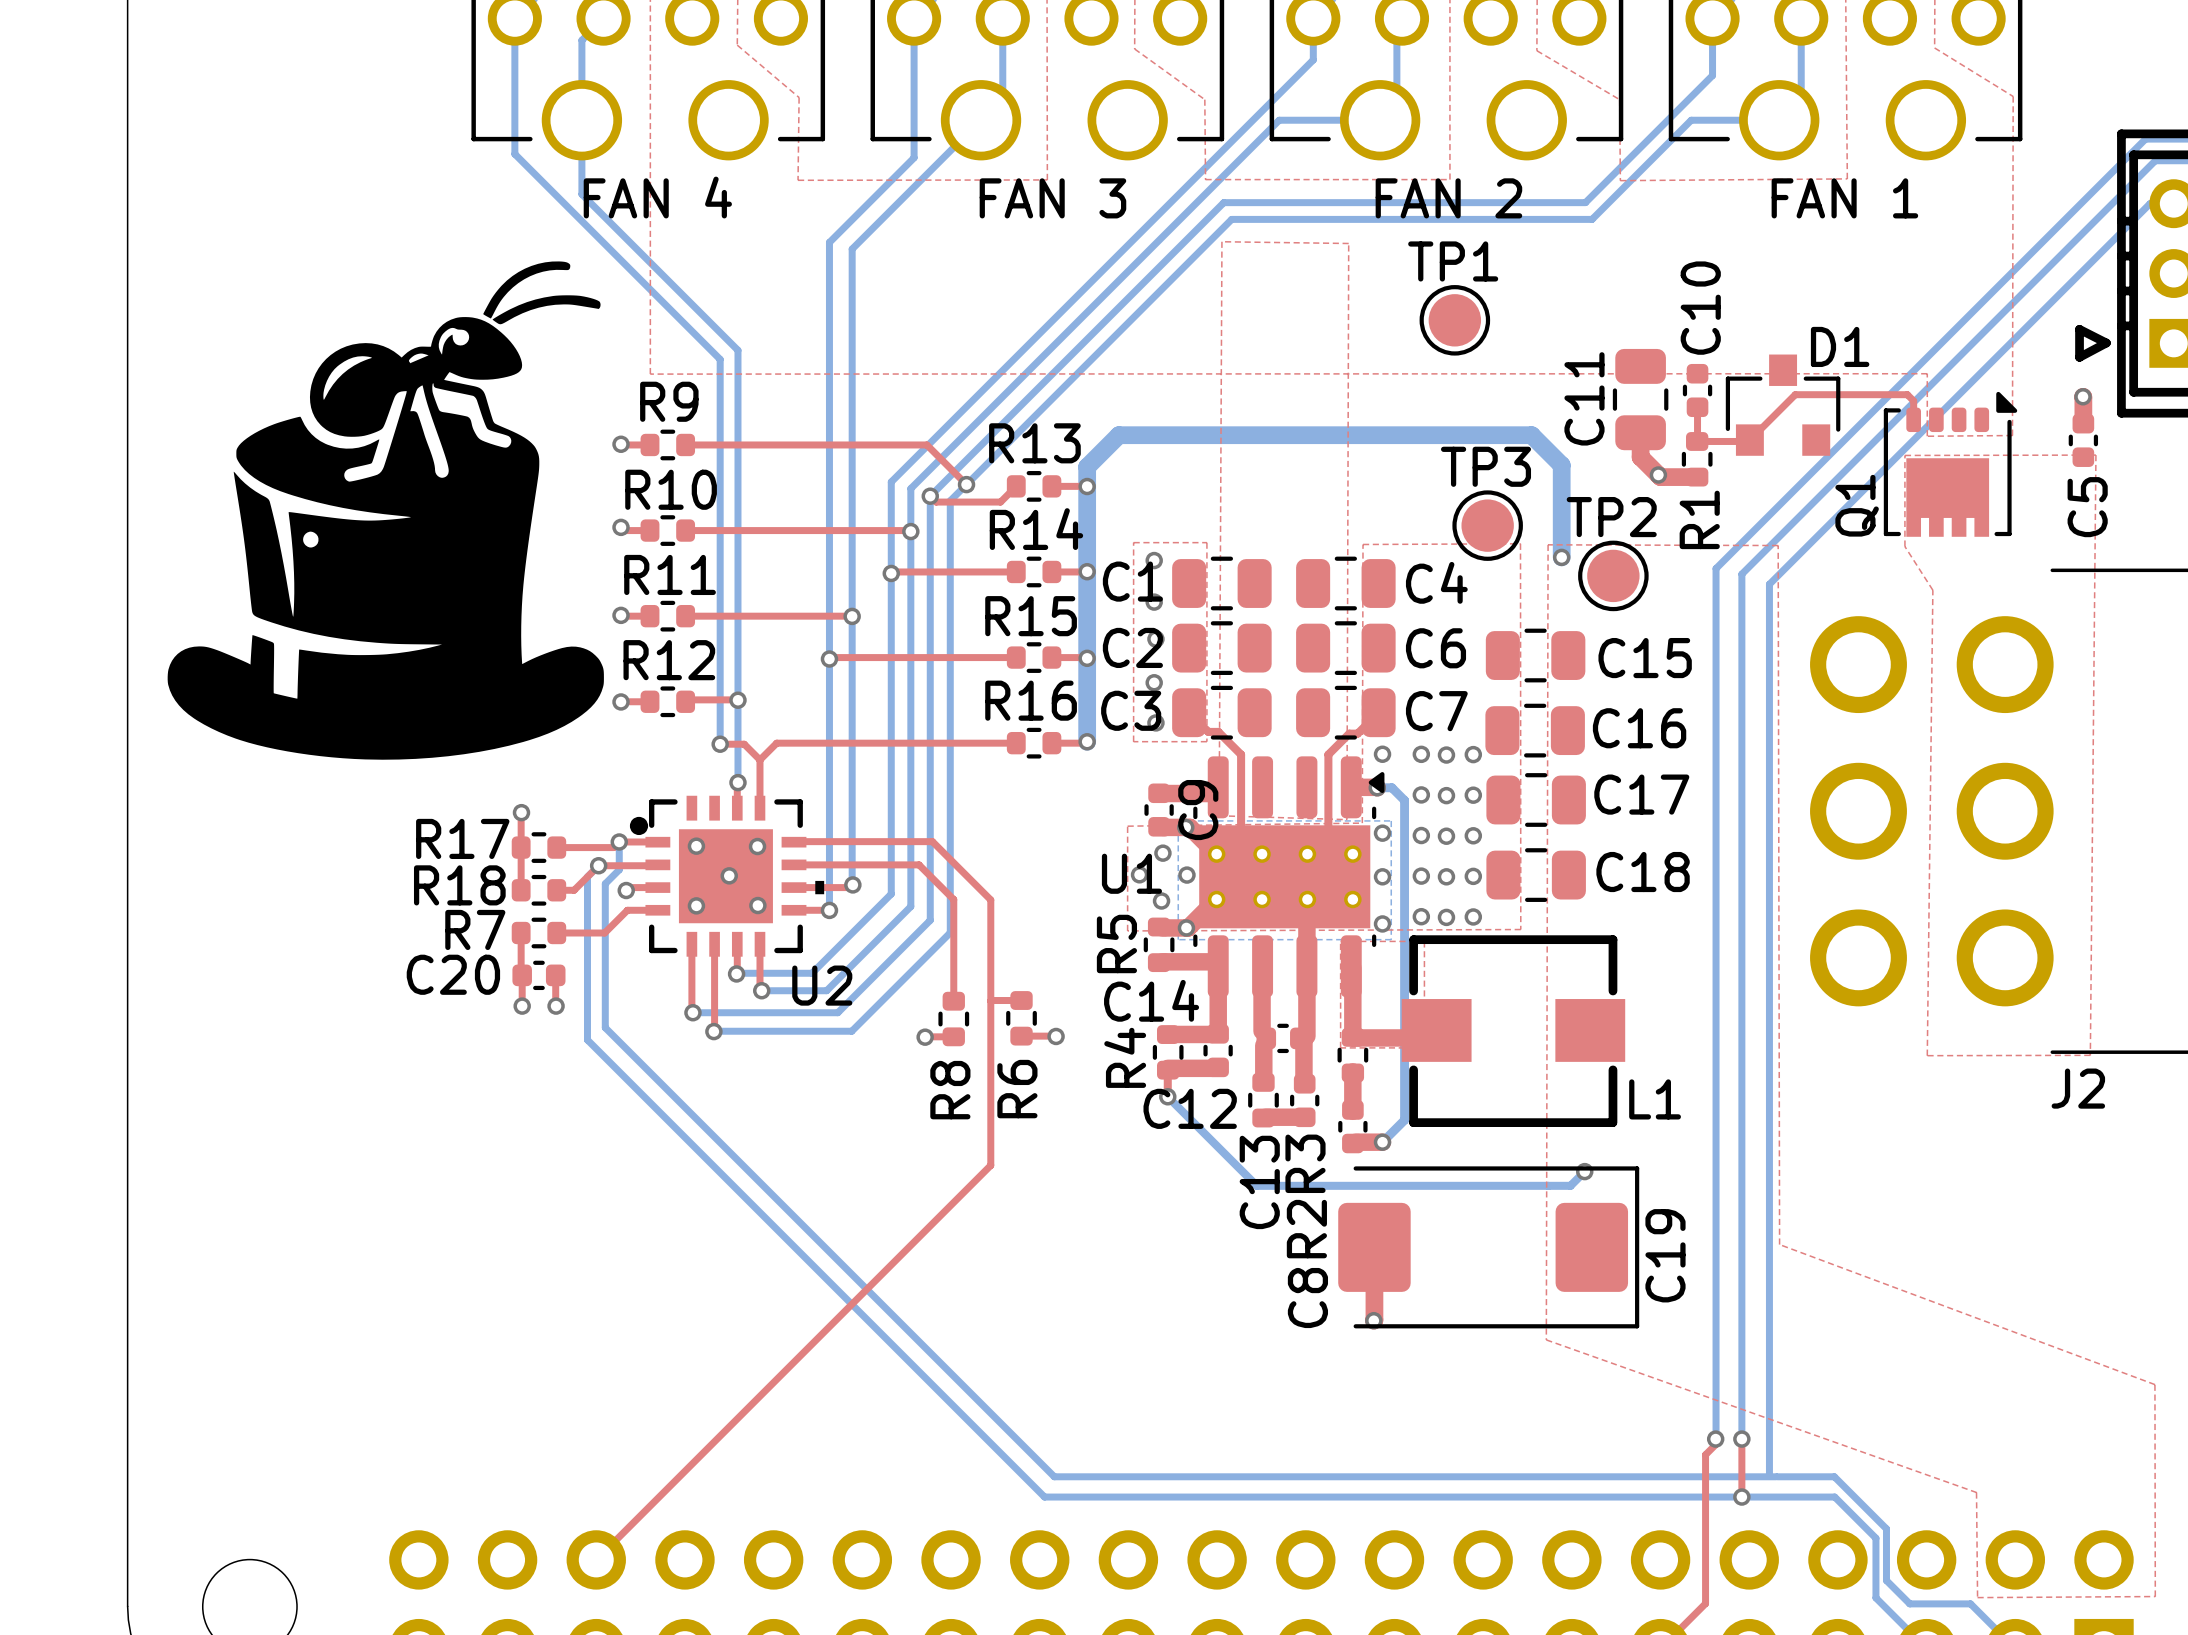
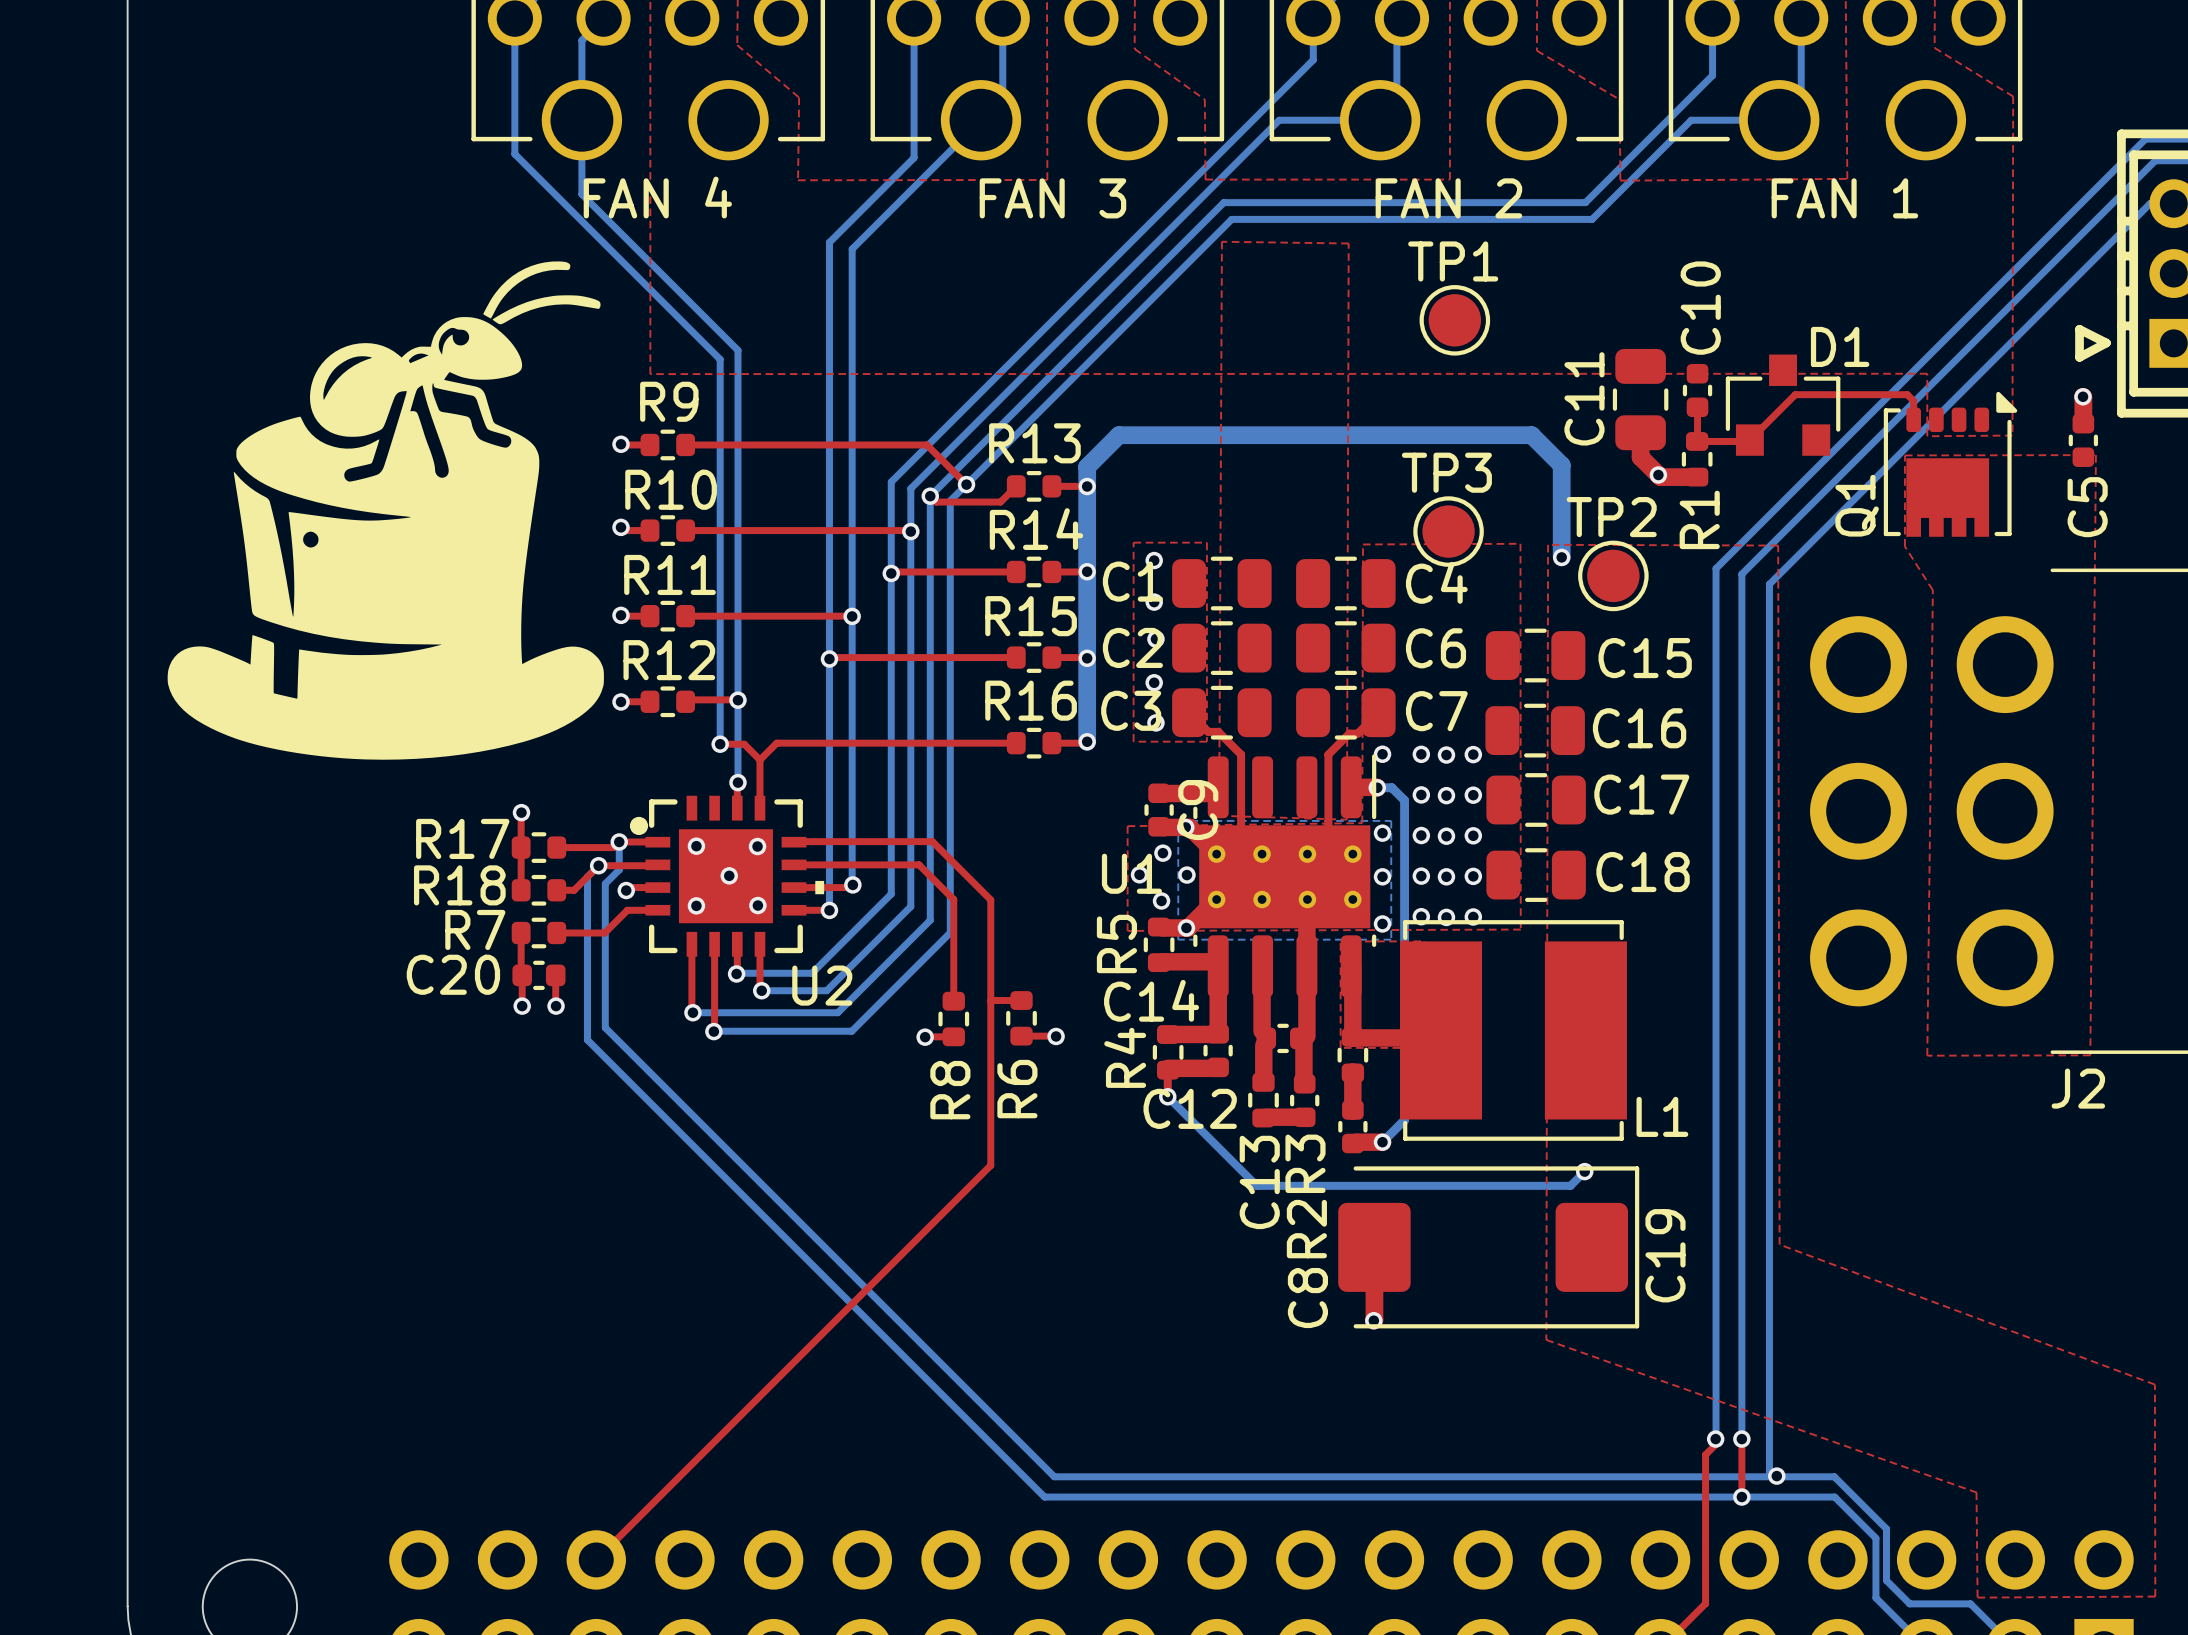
TP3 position: (1487, 525) -> (1448, 531)
U1 footprint: [1193, 756, 1385, 998] -> [1193, 754, 1377, 998]
L1 footprint: [1401, 935, 1626, 1128] -> [1399, 920, 1627, 1141]
via: none -> (1776, 1476)

